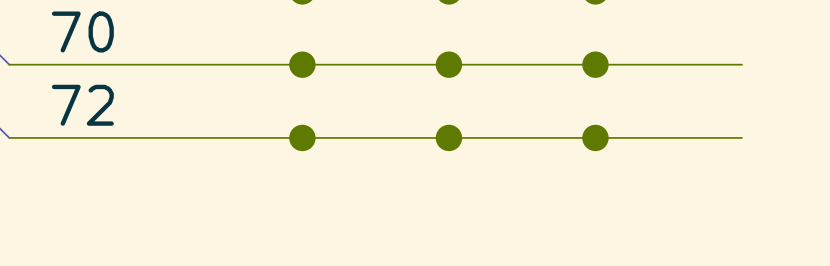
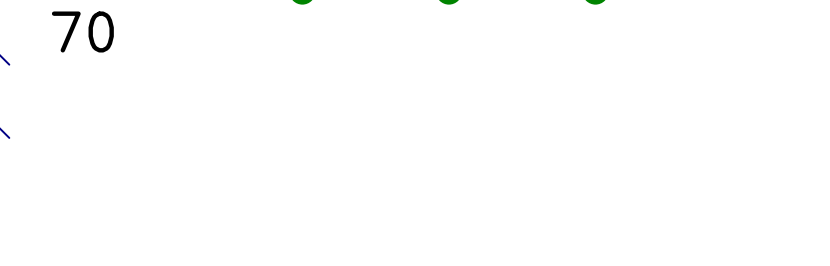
wire: (9, 64) (742, 64) -> none
junction: (302, 64) -> none
junction: (448, 64) -> none
junction: (595, 64) -> none
label: 72 (82, 105) -> none
wire: (9, 137) (742, 137) -> none
junction: (302, 137) -> none
junction: (448, 137) -> none
junction: (595, 137) -> none

